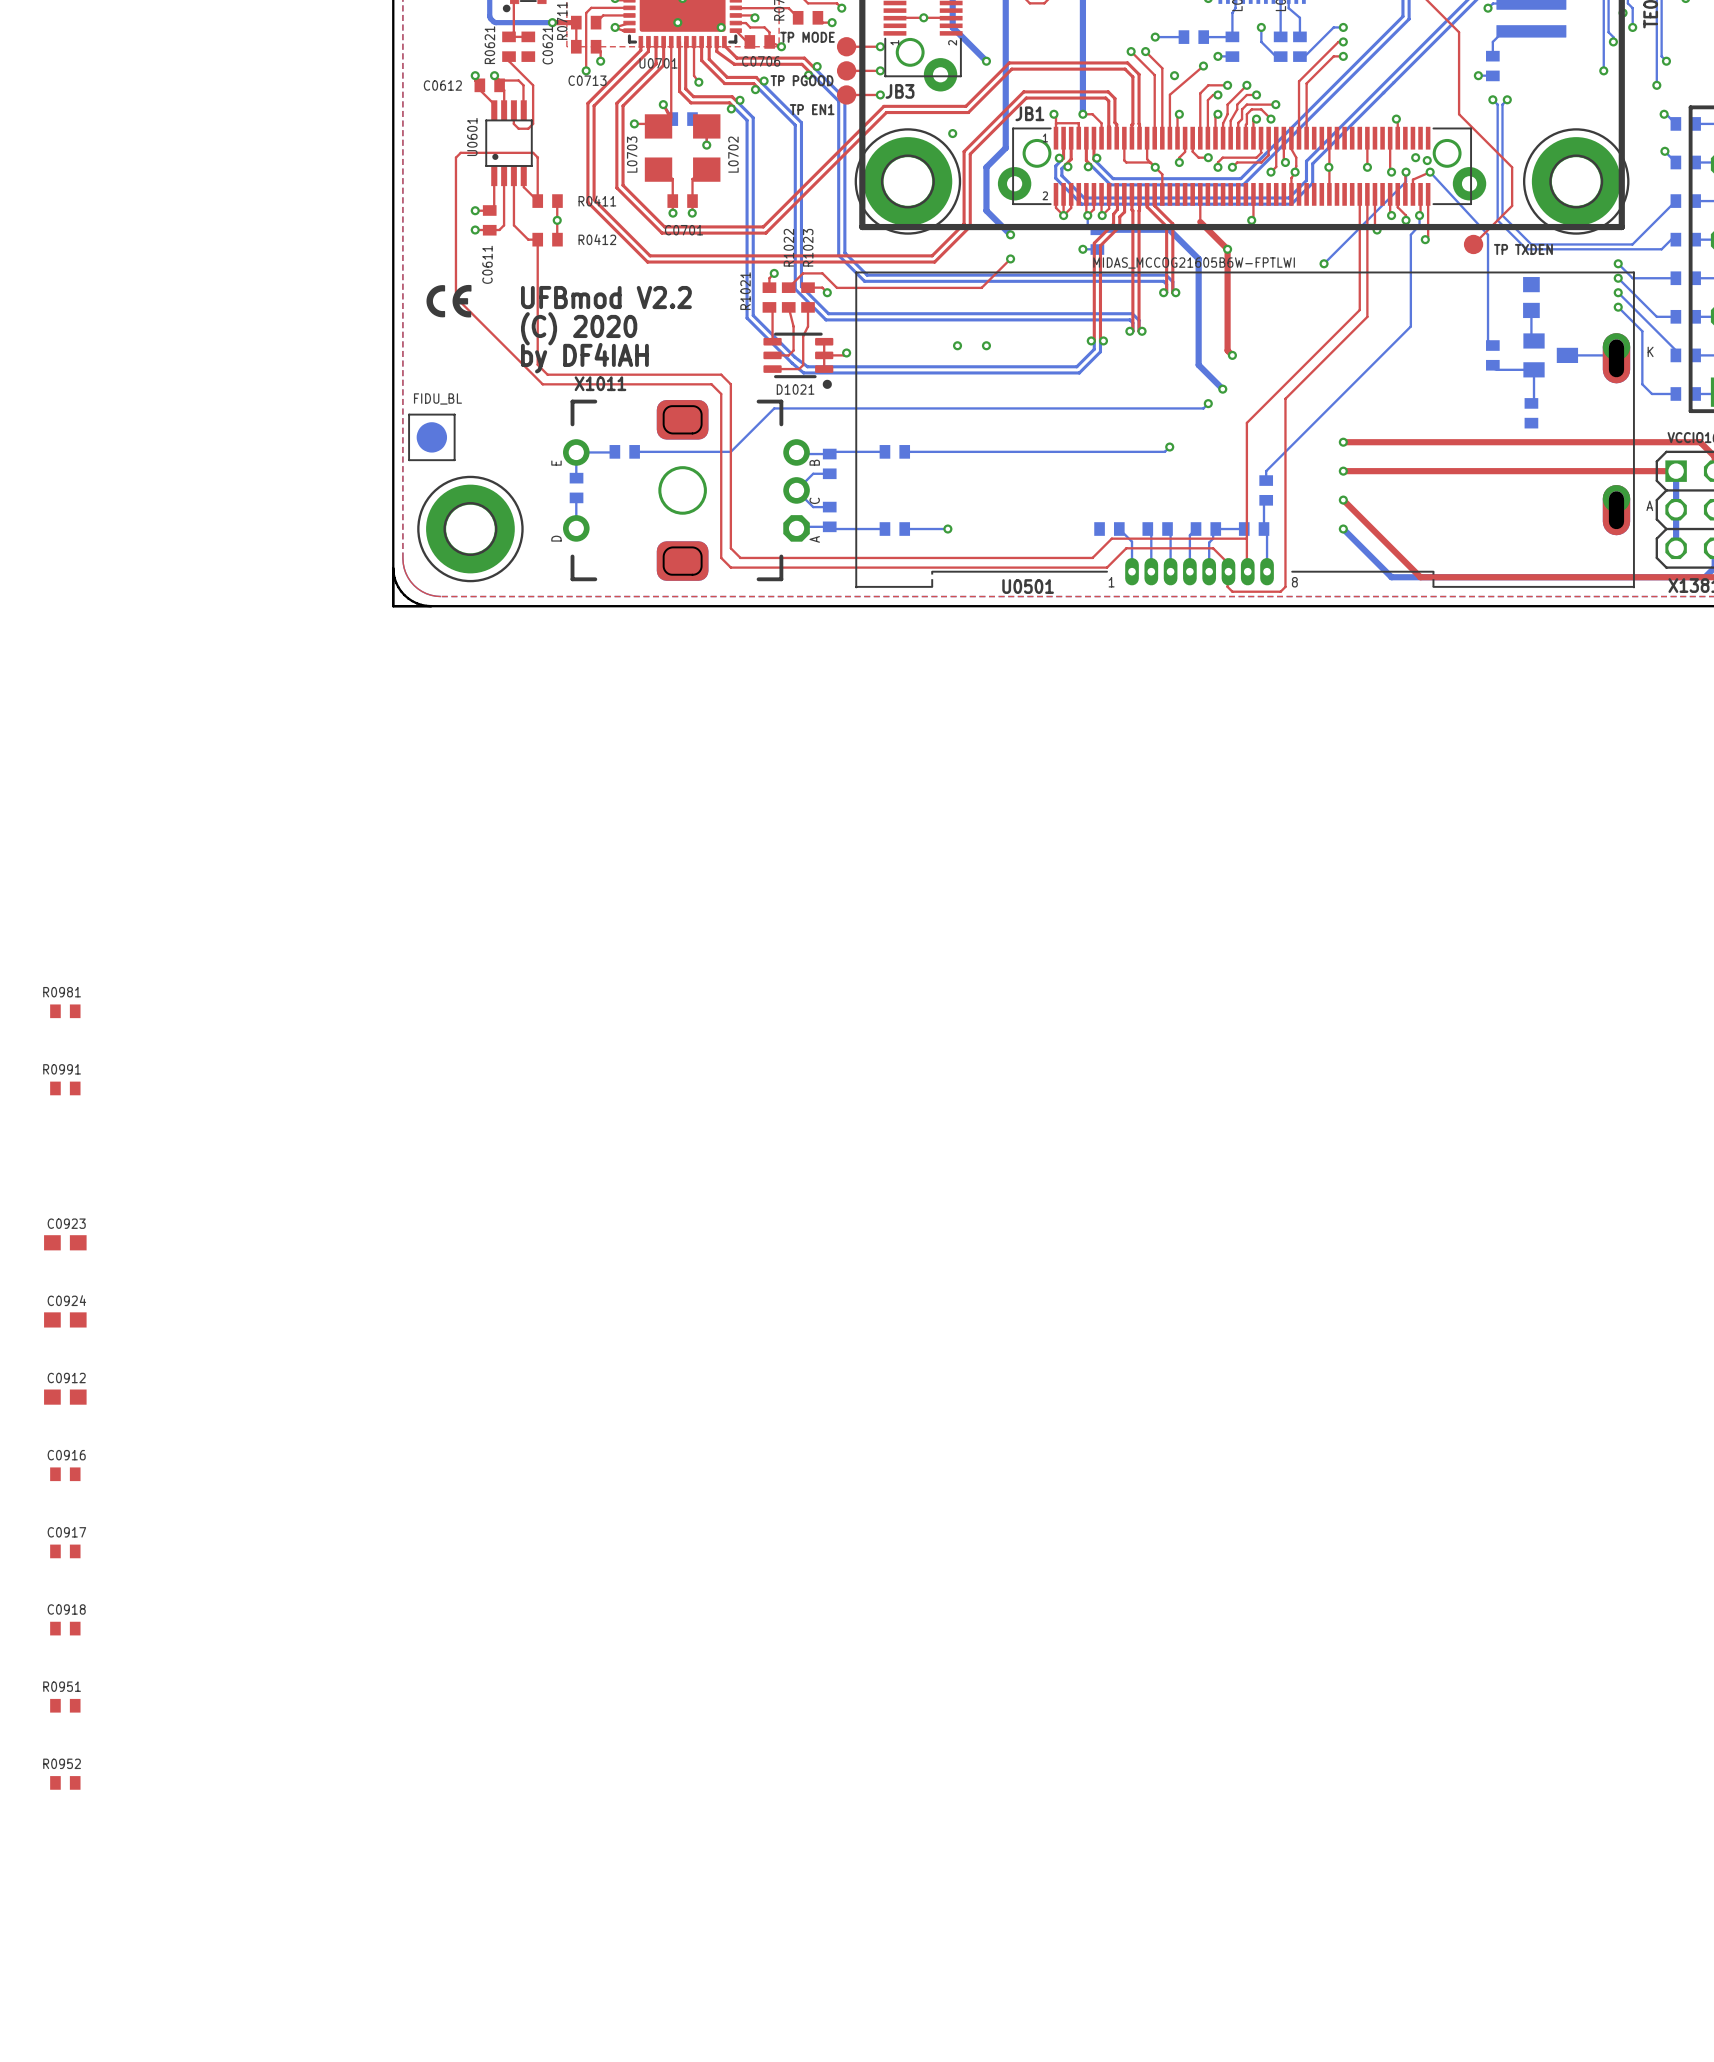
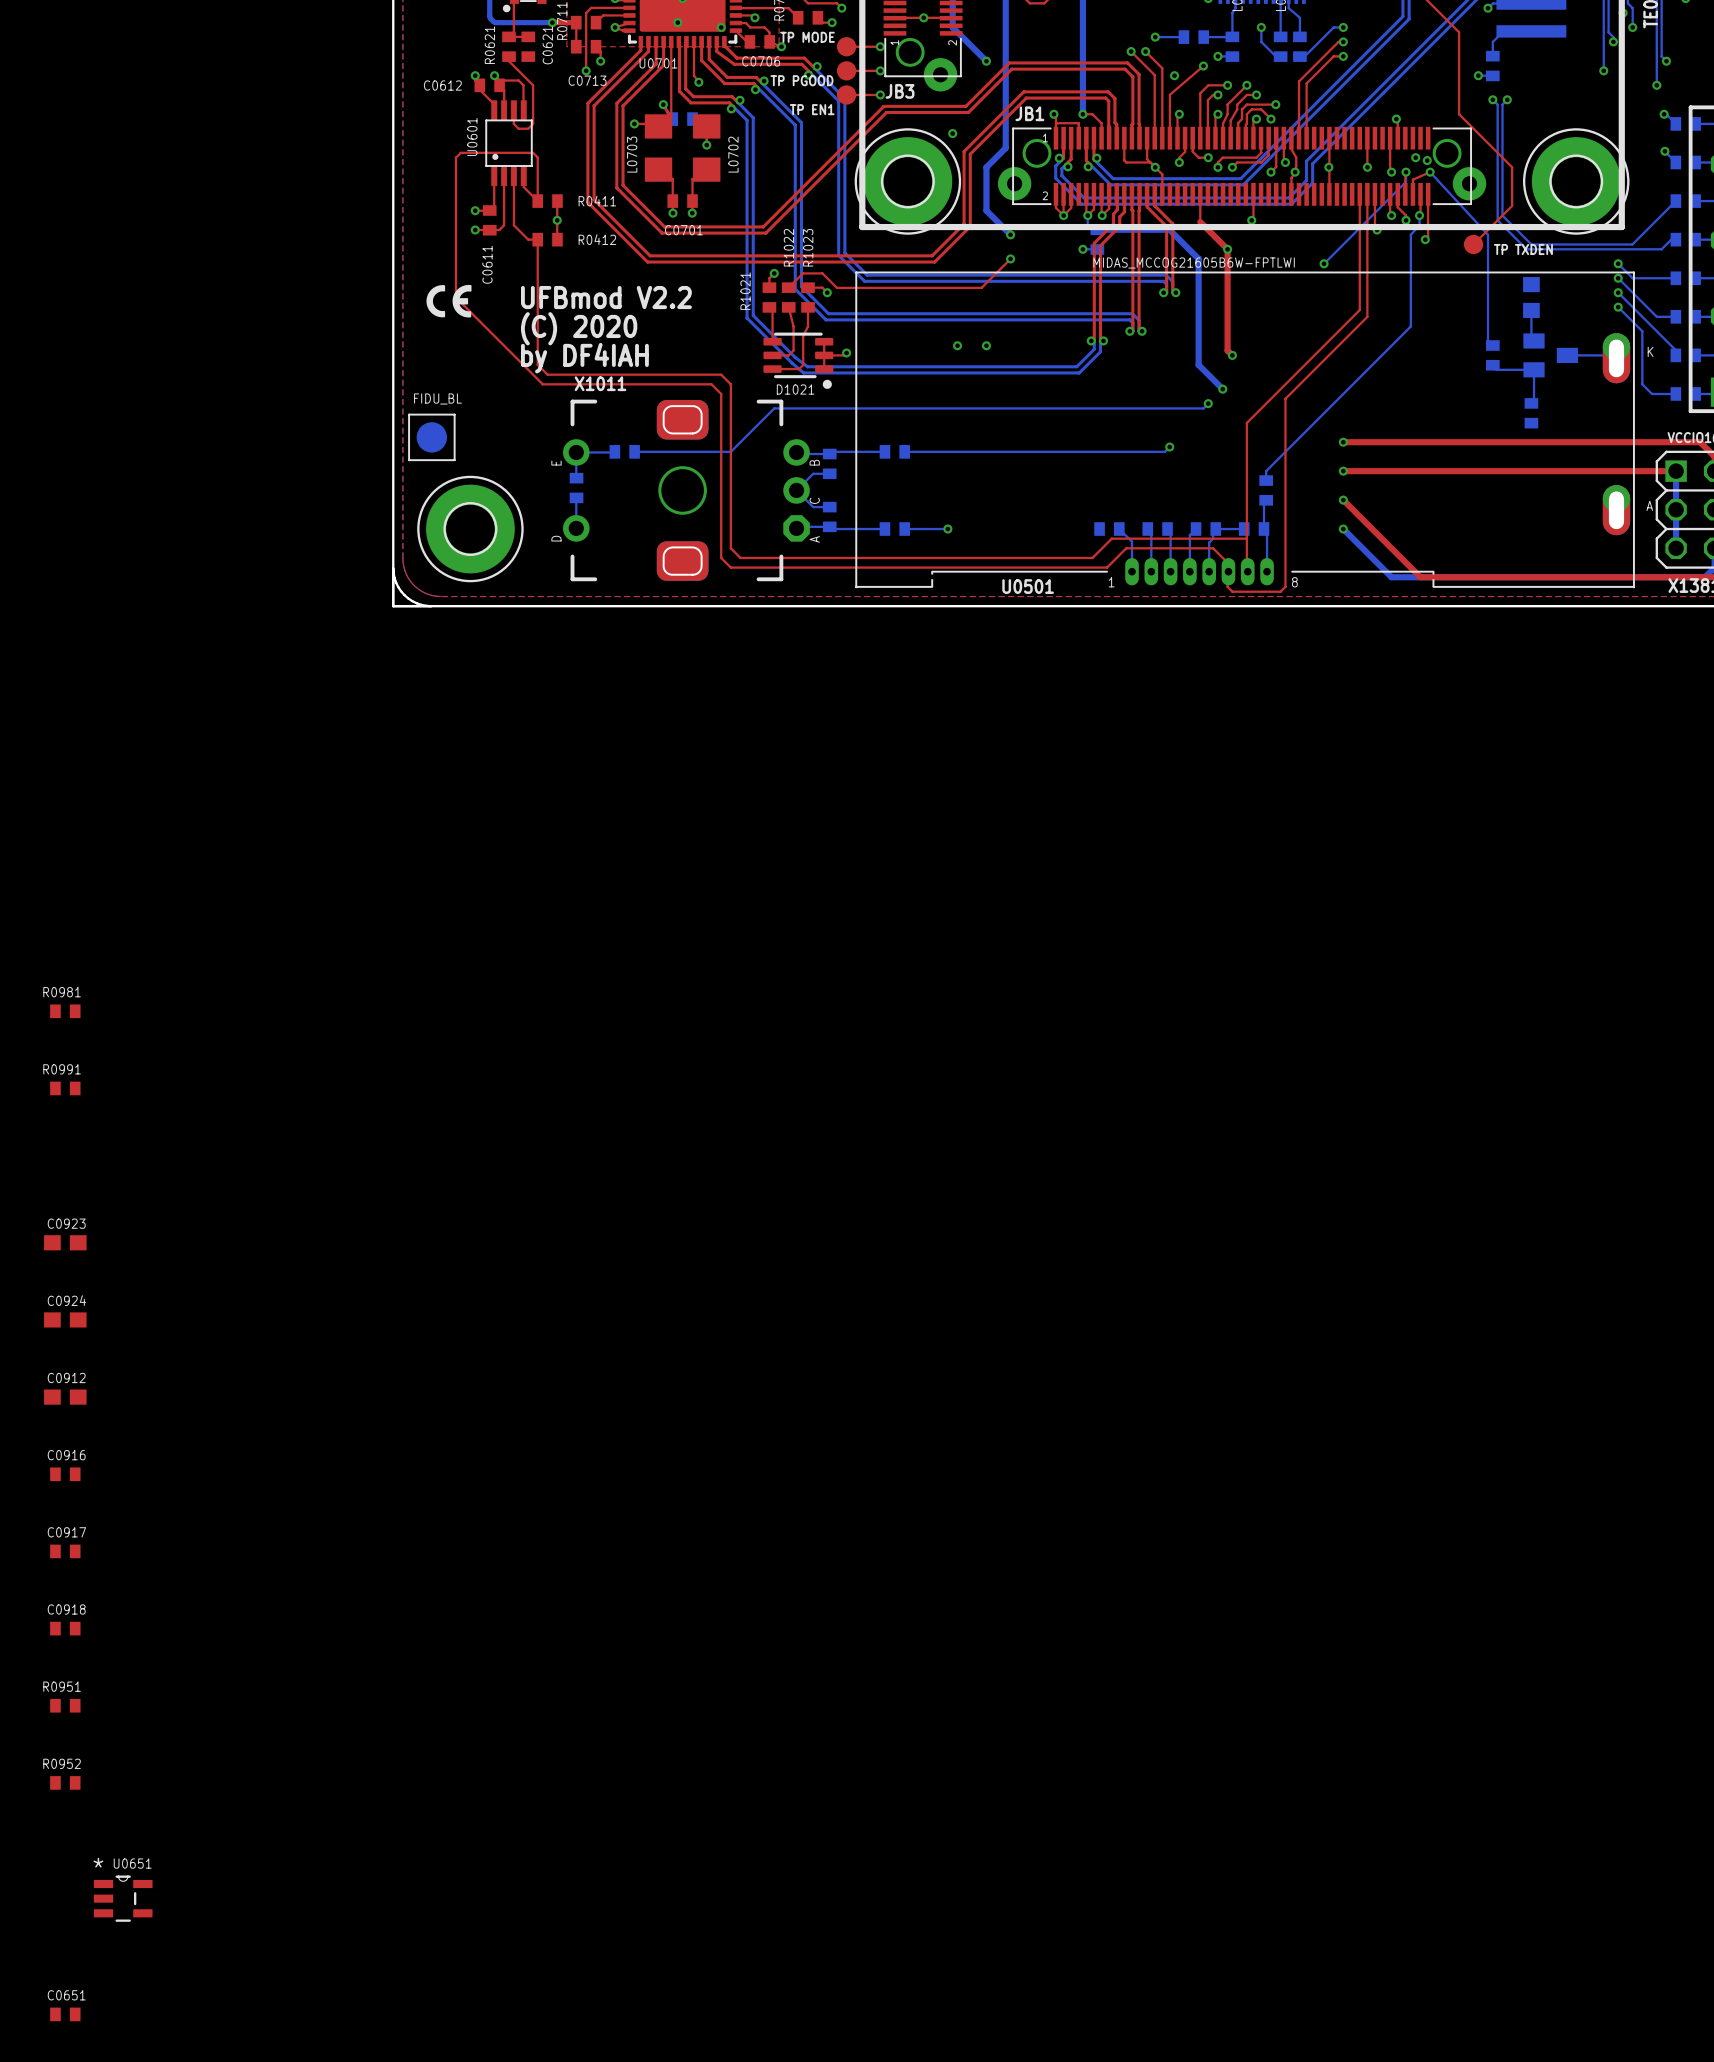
U0651: none -> (123, 1898)
C0651: none -> (65, 2014)

